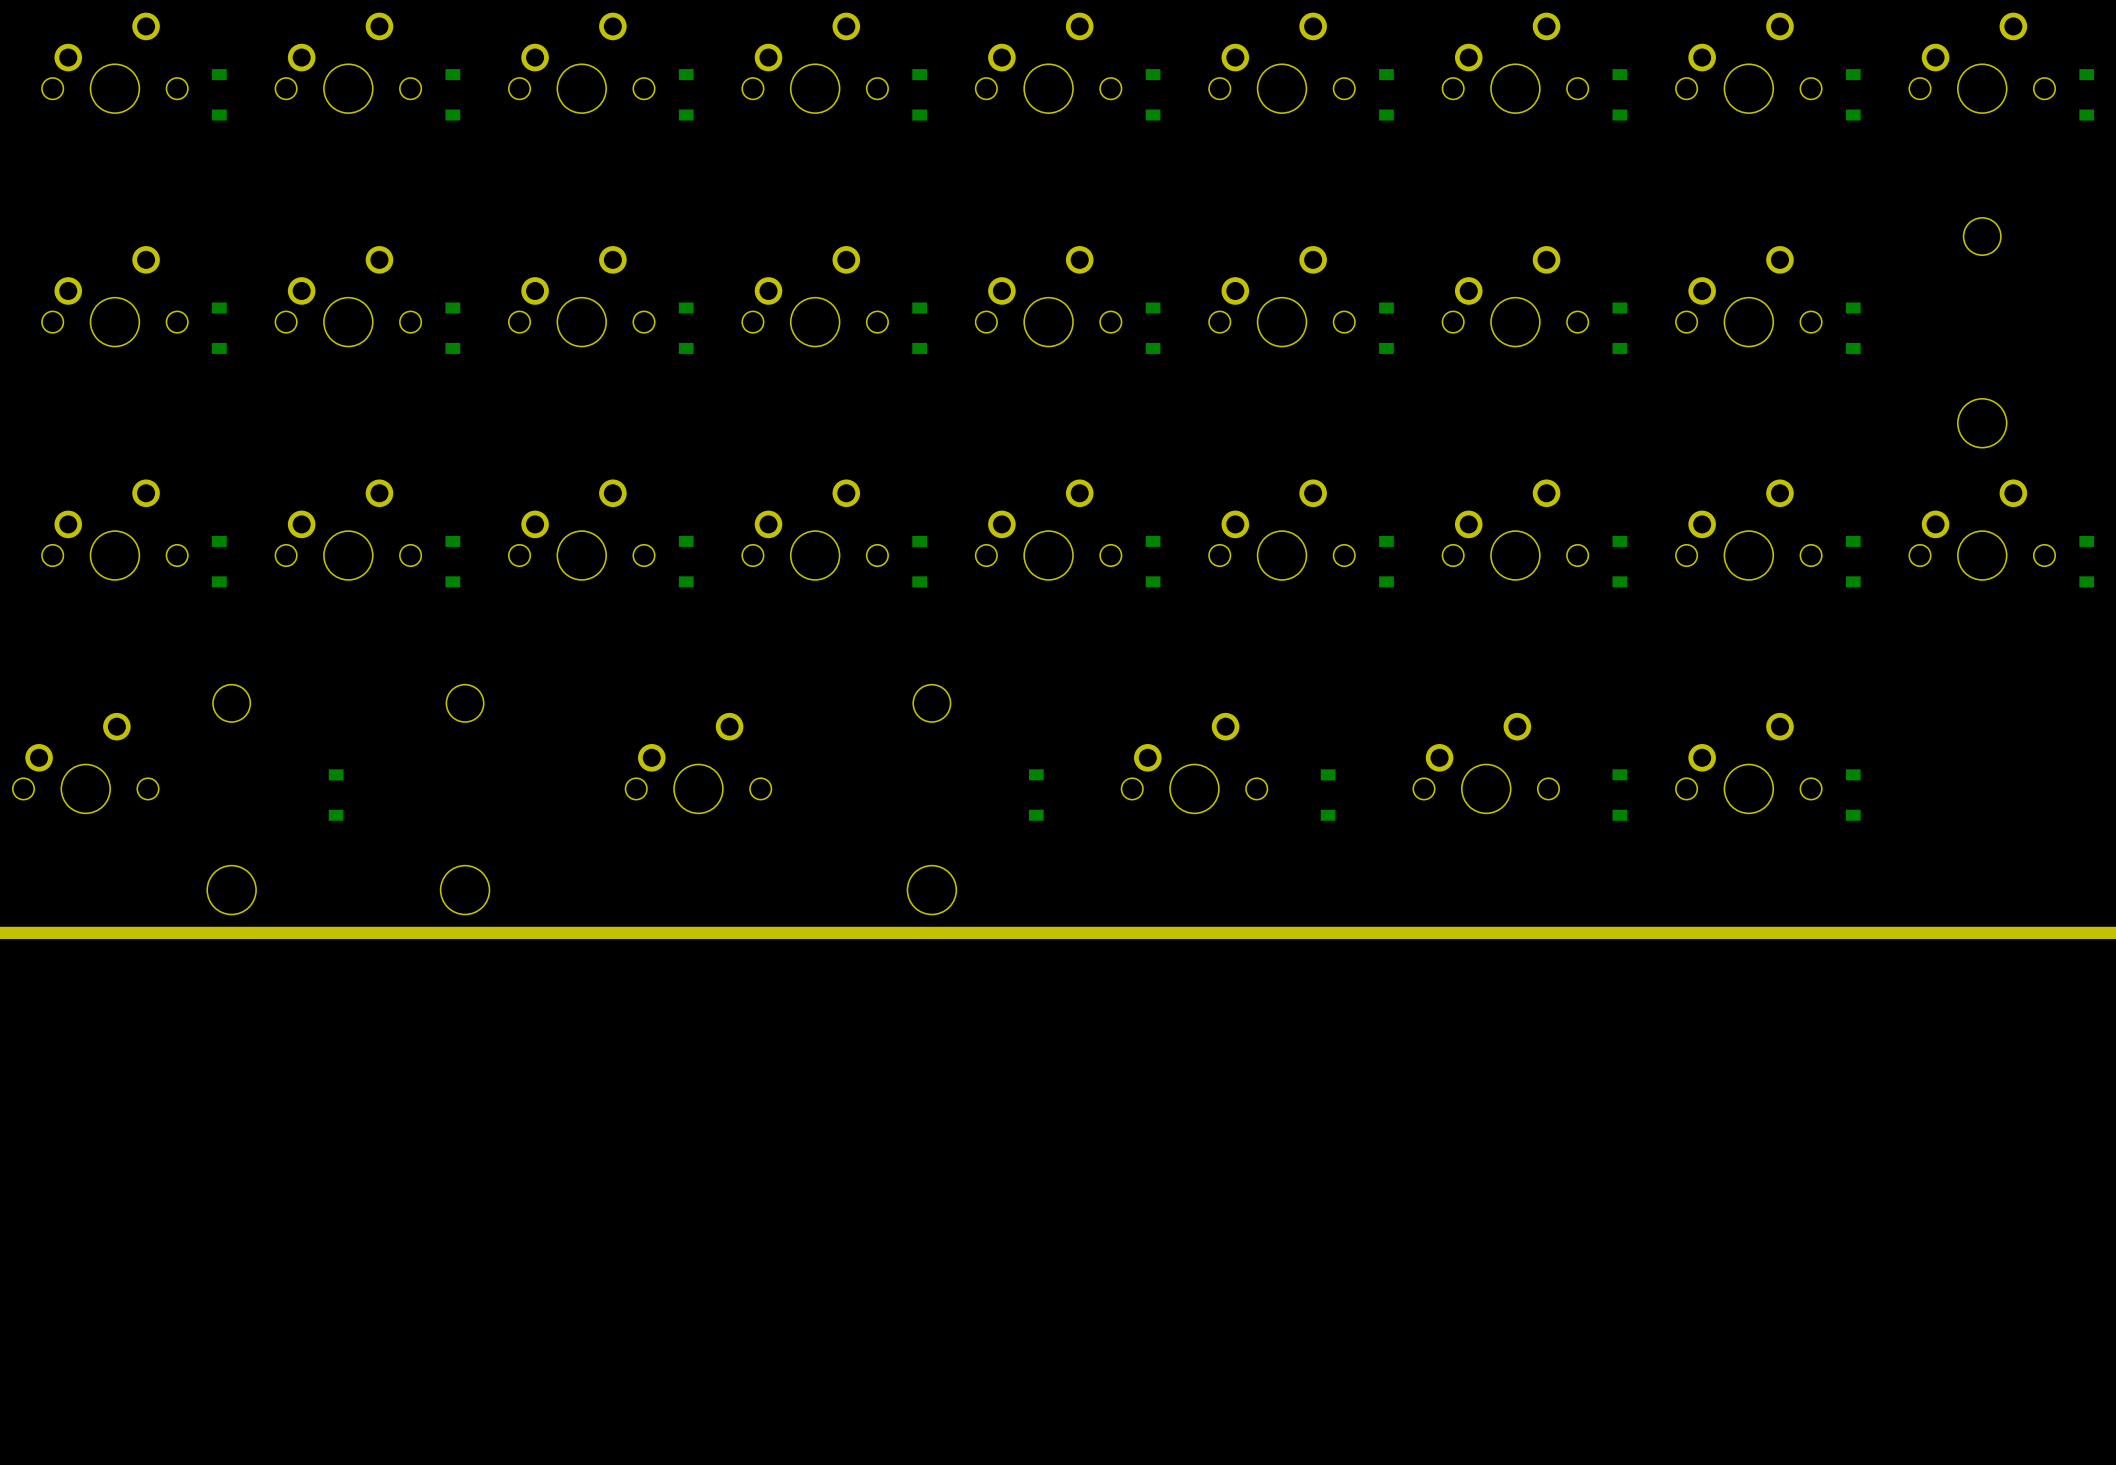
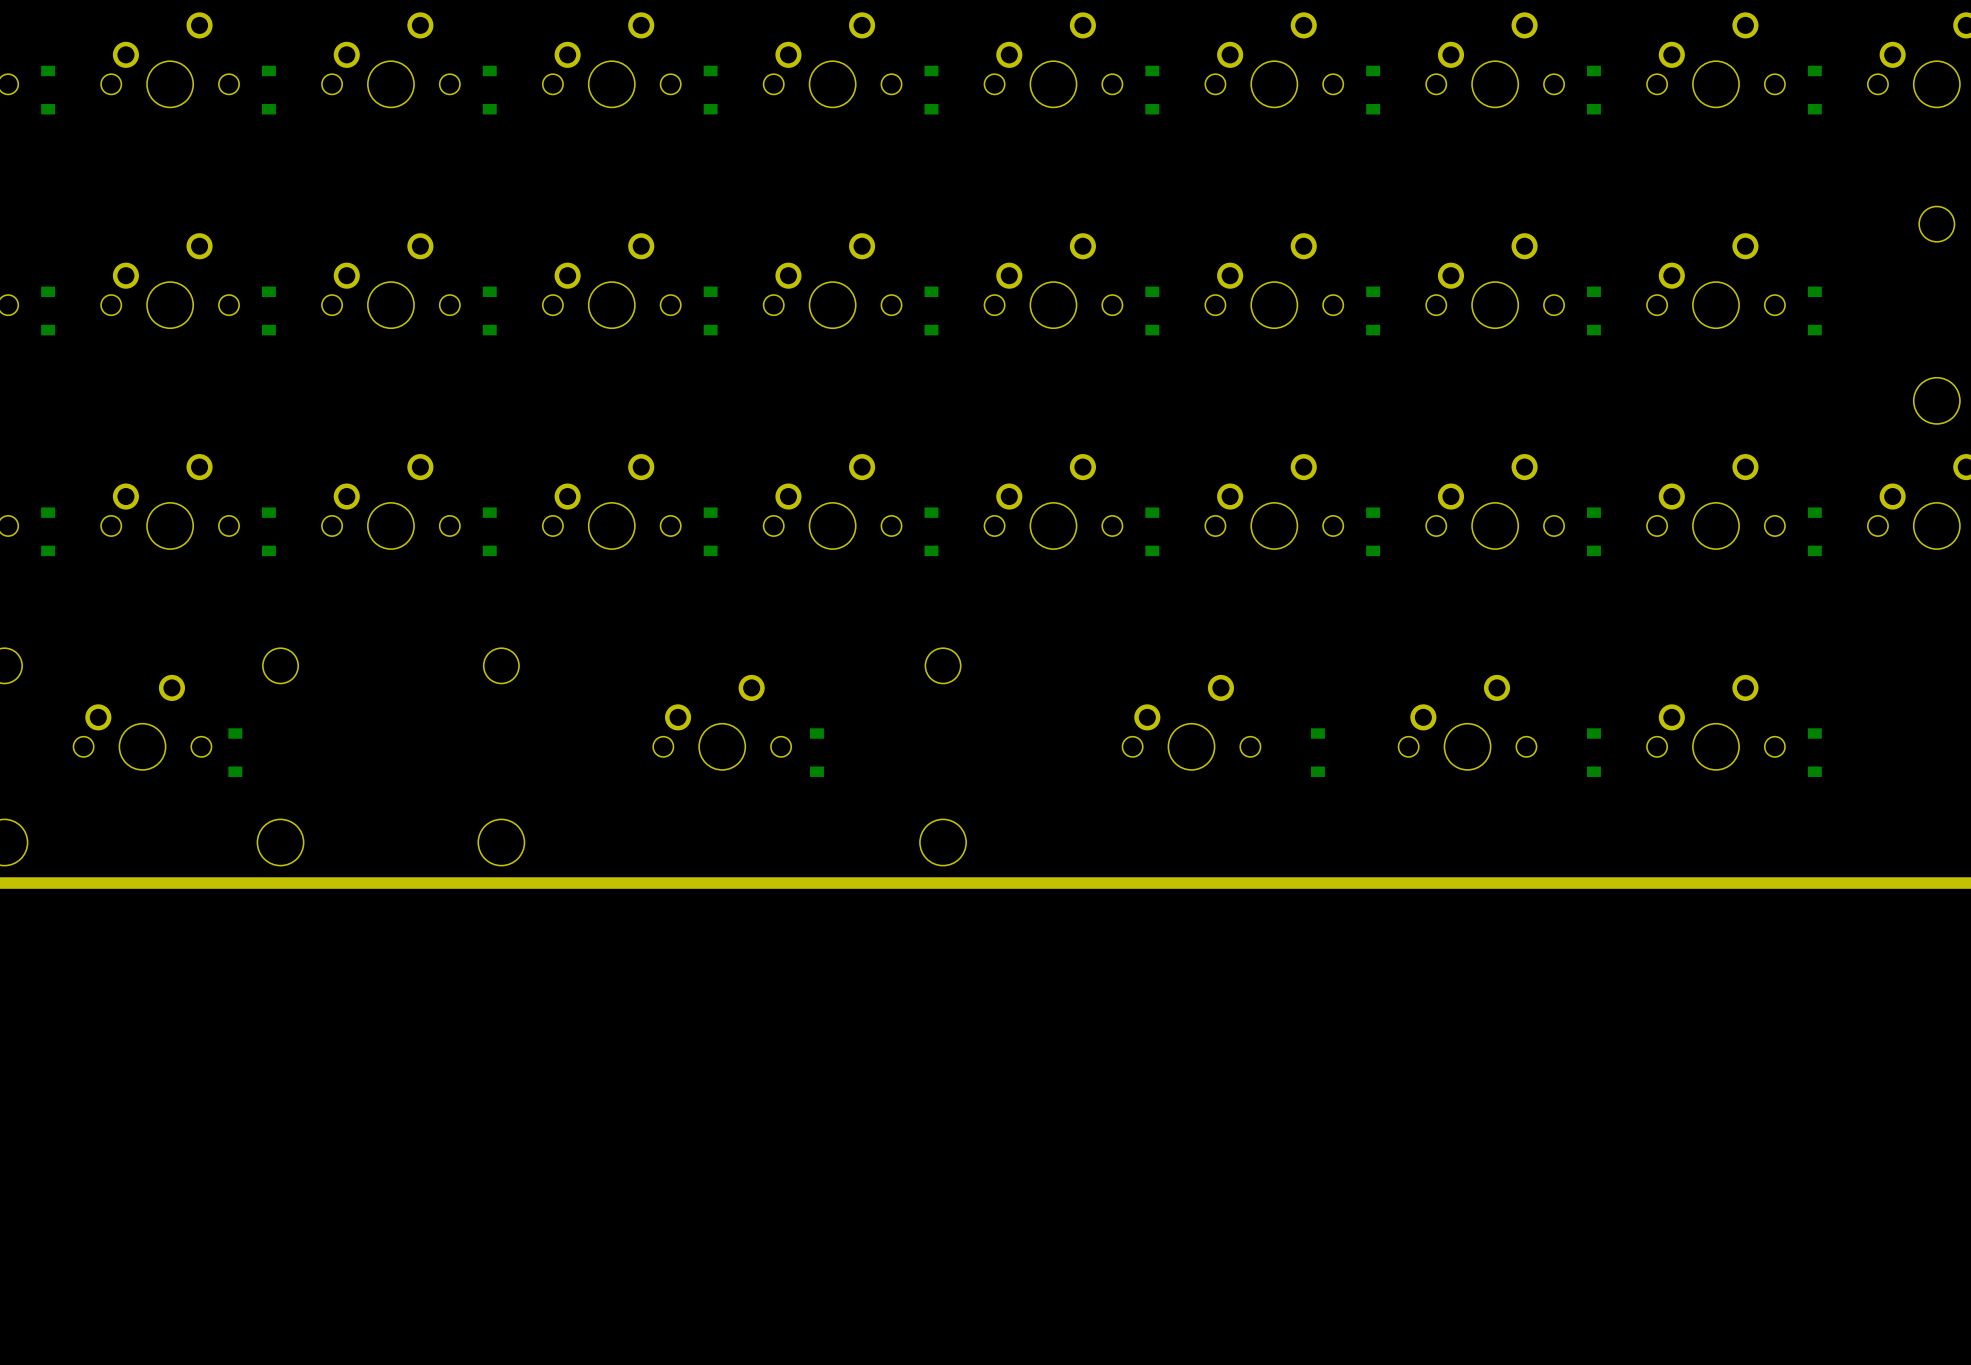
part position: (336, 795) -> (235, 752)
part: none -> (816, 752)
part: (1036, 795) -> none

